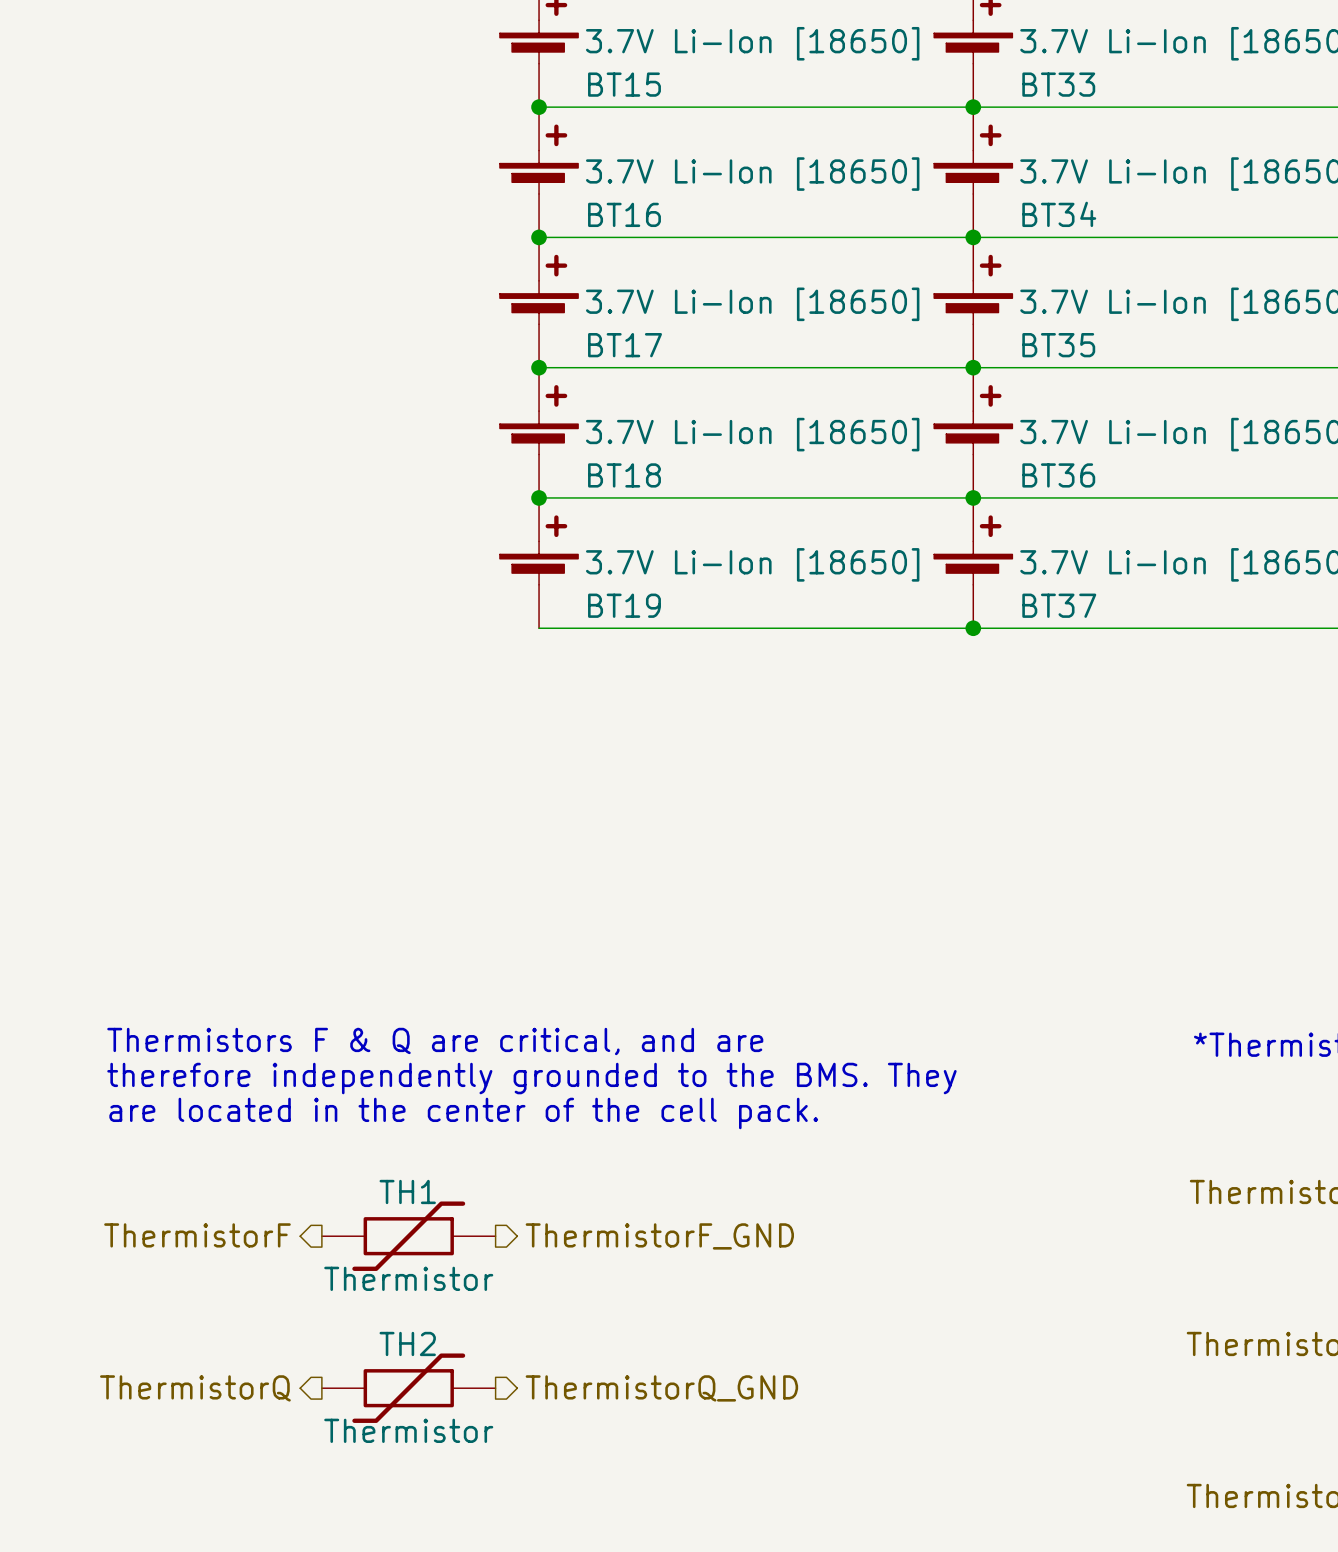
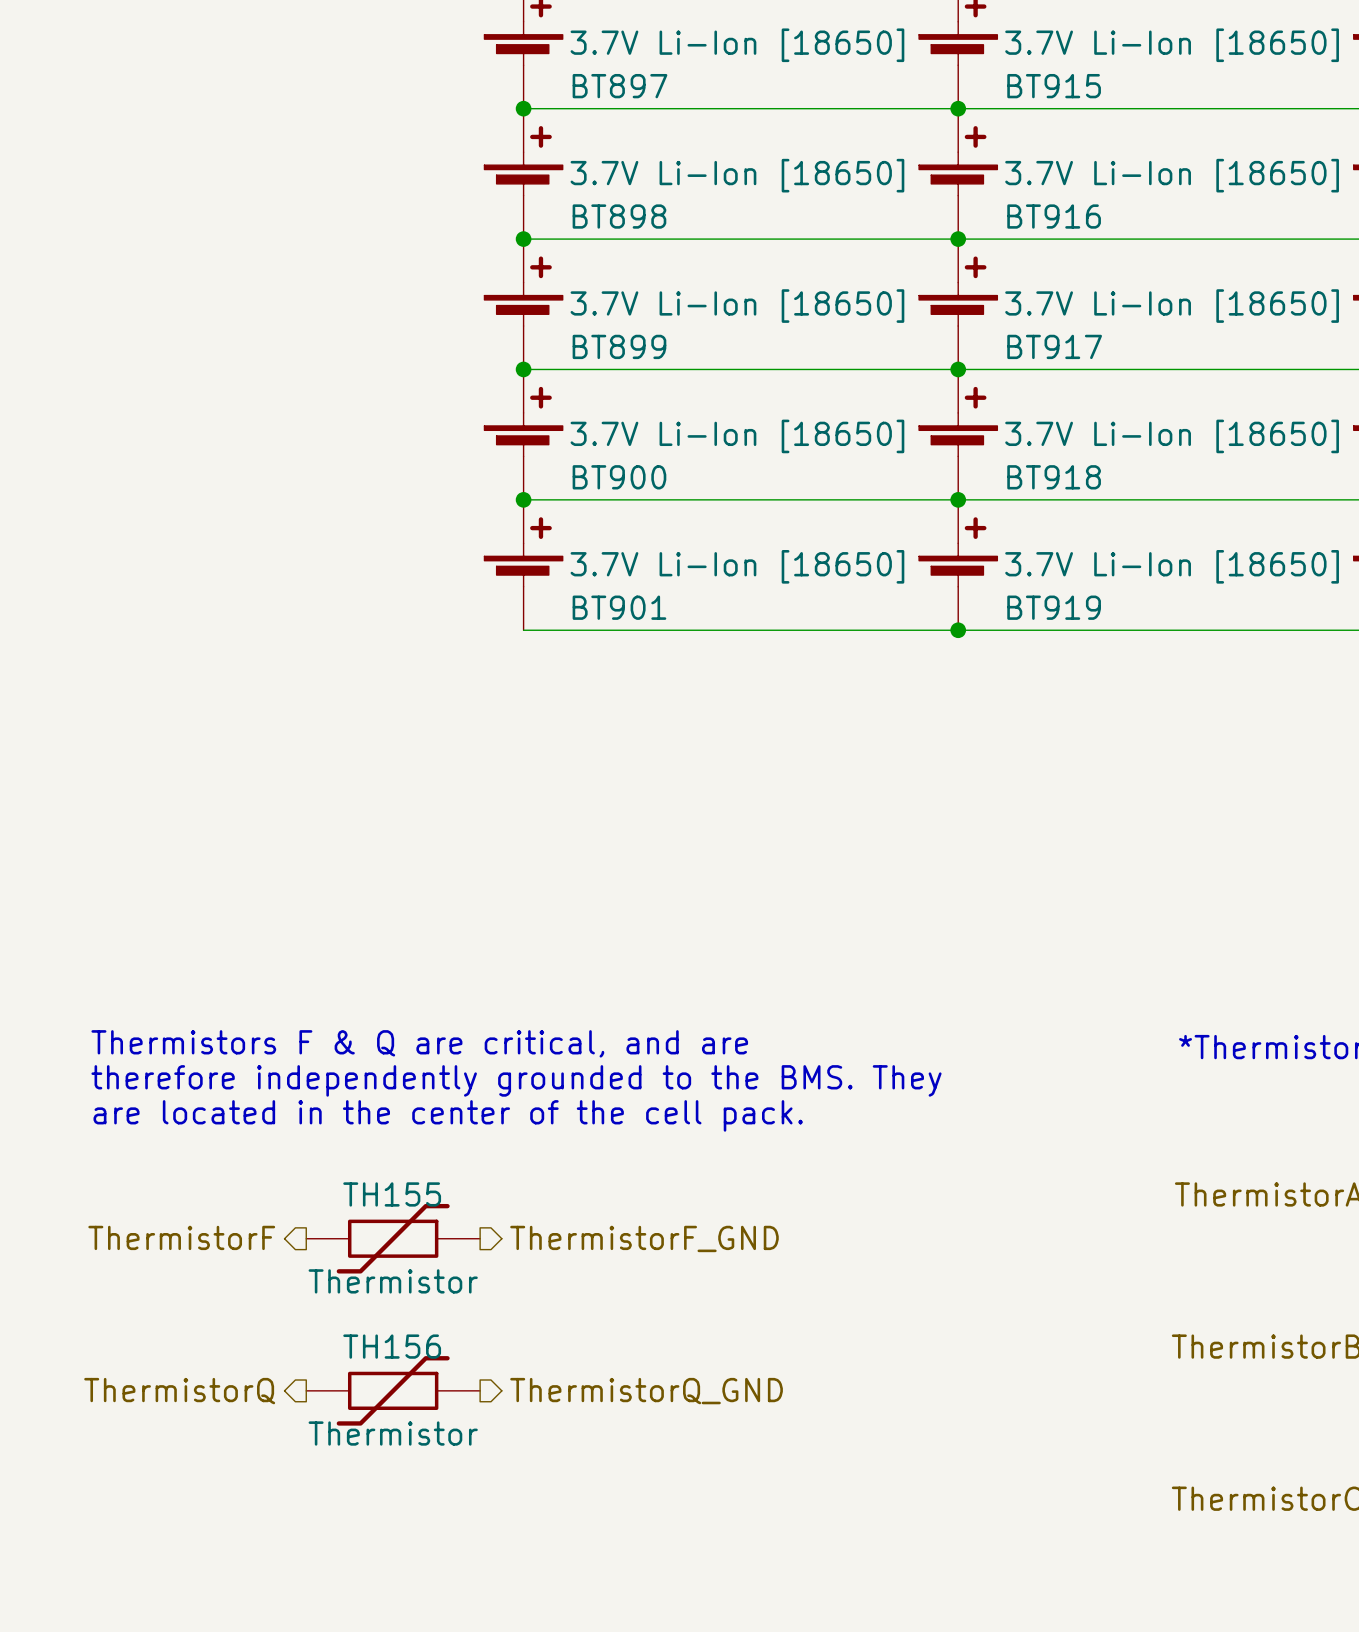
BT15 name: BT15 (624, 84) -> BT897 (619, 86)
BT33 name: BT33 (1058, 84) -> BT915 (1054, 86)
BT16 name: BT16 (624, 214) -> BT898 (619, 216)
BT34 name: BT34 (1059, 214) -> BT916 (1054, 216)
BT17 name: BT17 (625, 345) -> BT899 (619, 346)
BT35 name: BT35 (1058, 345) -> BT917 (1054, 346)
BT18 name: BT18 (624, 475) -> BT900 (619, 477)
BT36 name: BT36 (1058, 475) -> BT918 (1054, 477)
BT19 name: BT19 (624, 605) -> BT901 (619, 607)
BT37 name: BT37 (1059, 605) -> BT919 (1054, 607)
TH1 name: TH1 (407, 1191) -> TH155 (392, 1194)
TH2 name: TH2 (407, 1343) -> TH156 (392, 1346)

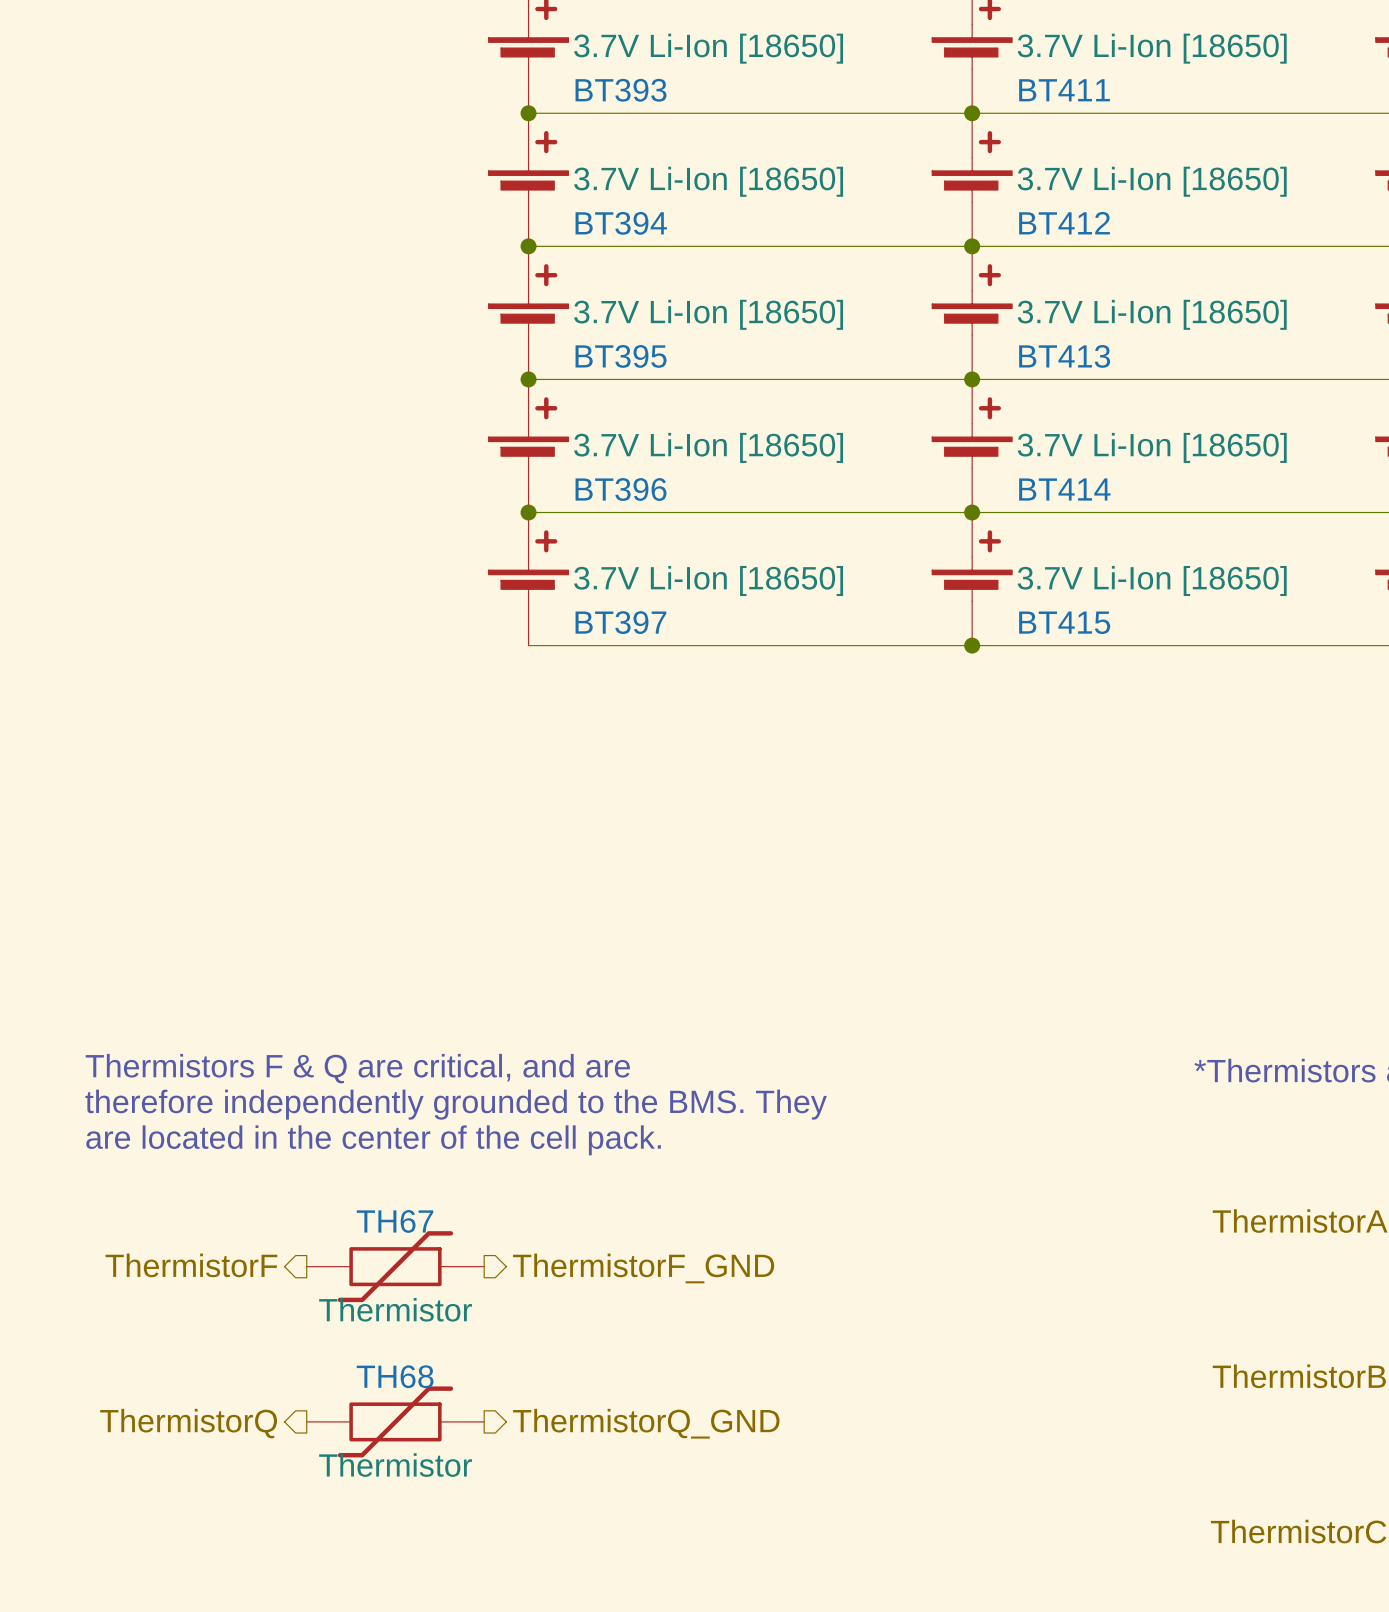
BT897 name: BT897 (619, 86) -> BT393 (621, 90)
BT915 name: BT915 (1054, 86) -> BT411 (1064, 90)
BT898 name: BT898 (619, 216) -> BT394 (621, 223)
BT916 name: BT916 (1054, 216) -> BT412 (1064, 223)
BT899 name: BT899 (619, 346) -> BT395 (621, 356)
BT917 name: BT917 (1054, 346) -> BT413 (1064, 356)
BT900 name: BT900 (619, 477) -> BT396 (621, 489)
BT918 name: BT918 (1054, 477) -> BT414 (1064, 489)
BT901 name: BT901 (619, 607) -> BT397 (620, 622)
BT919 name: BT919 (1054, 607) -> BT415 (1064, 622)
TH155 name: TH155 (392, 1194) -> TH67 (395, 1221)
TH156 name: TH156 (392, 1346) -> TH68 (395, 1376)

